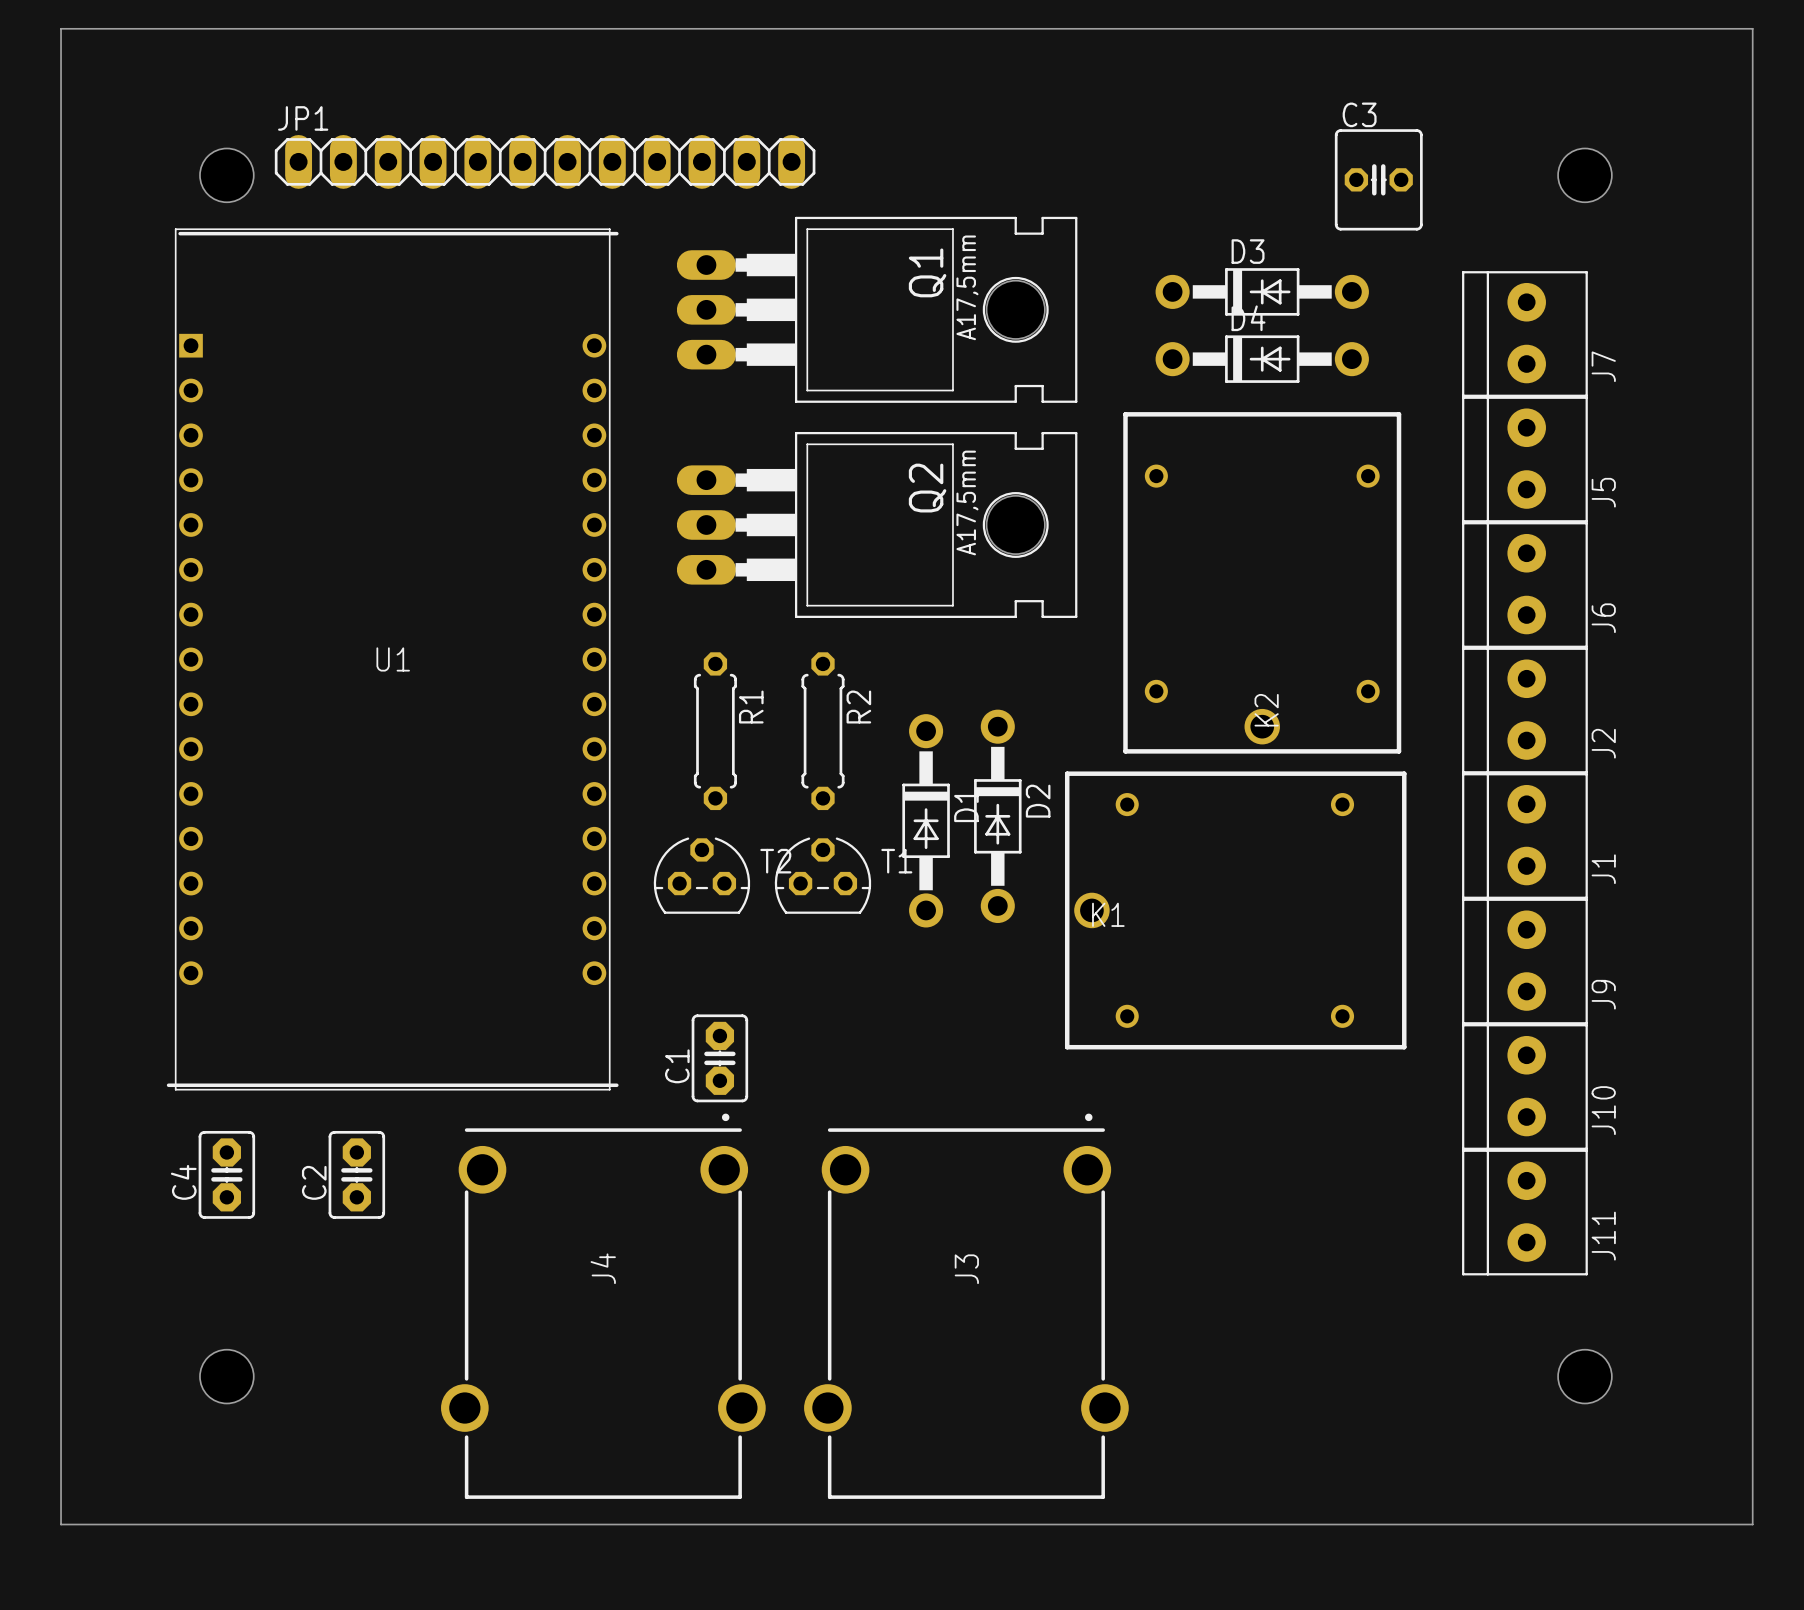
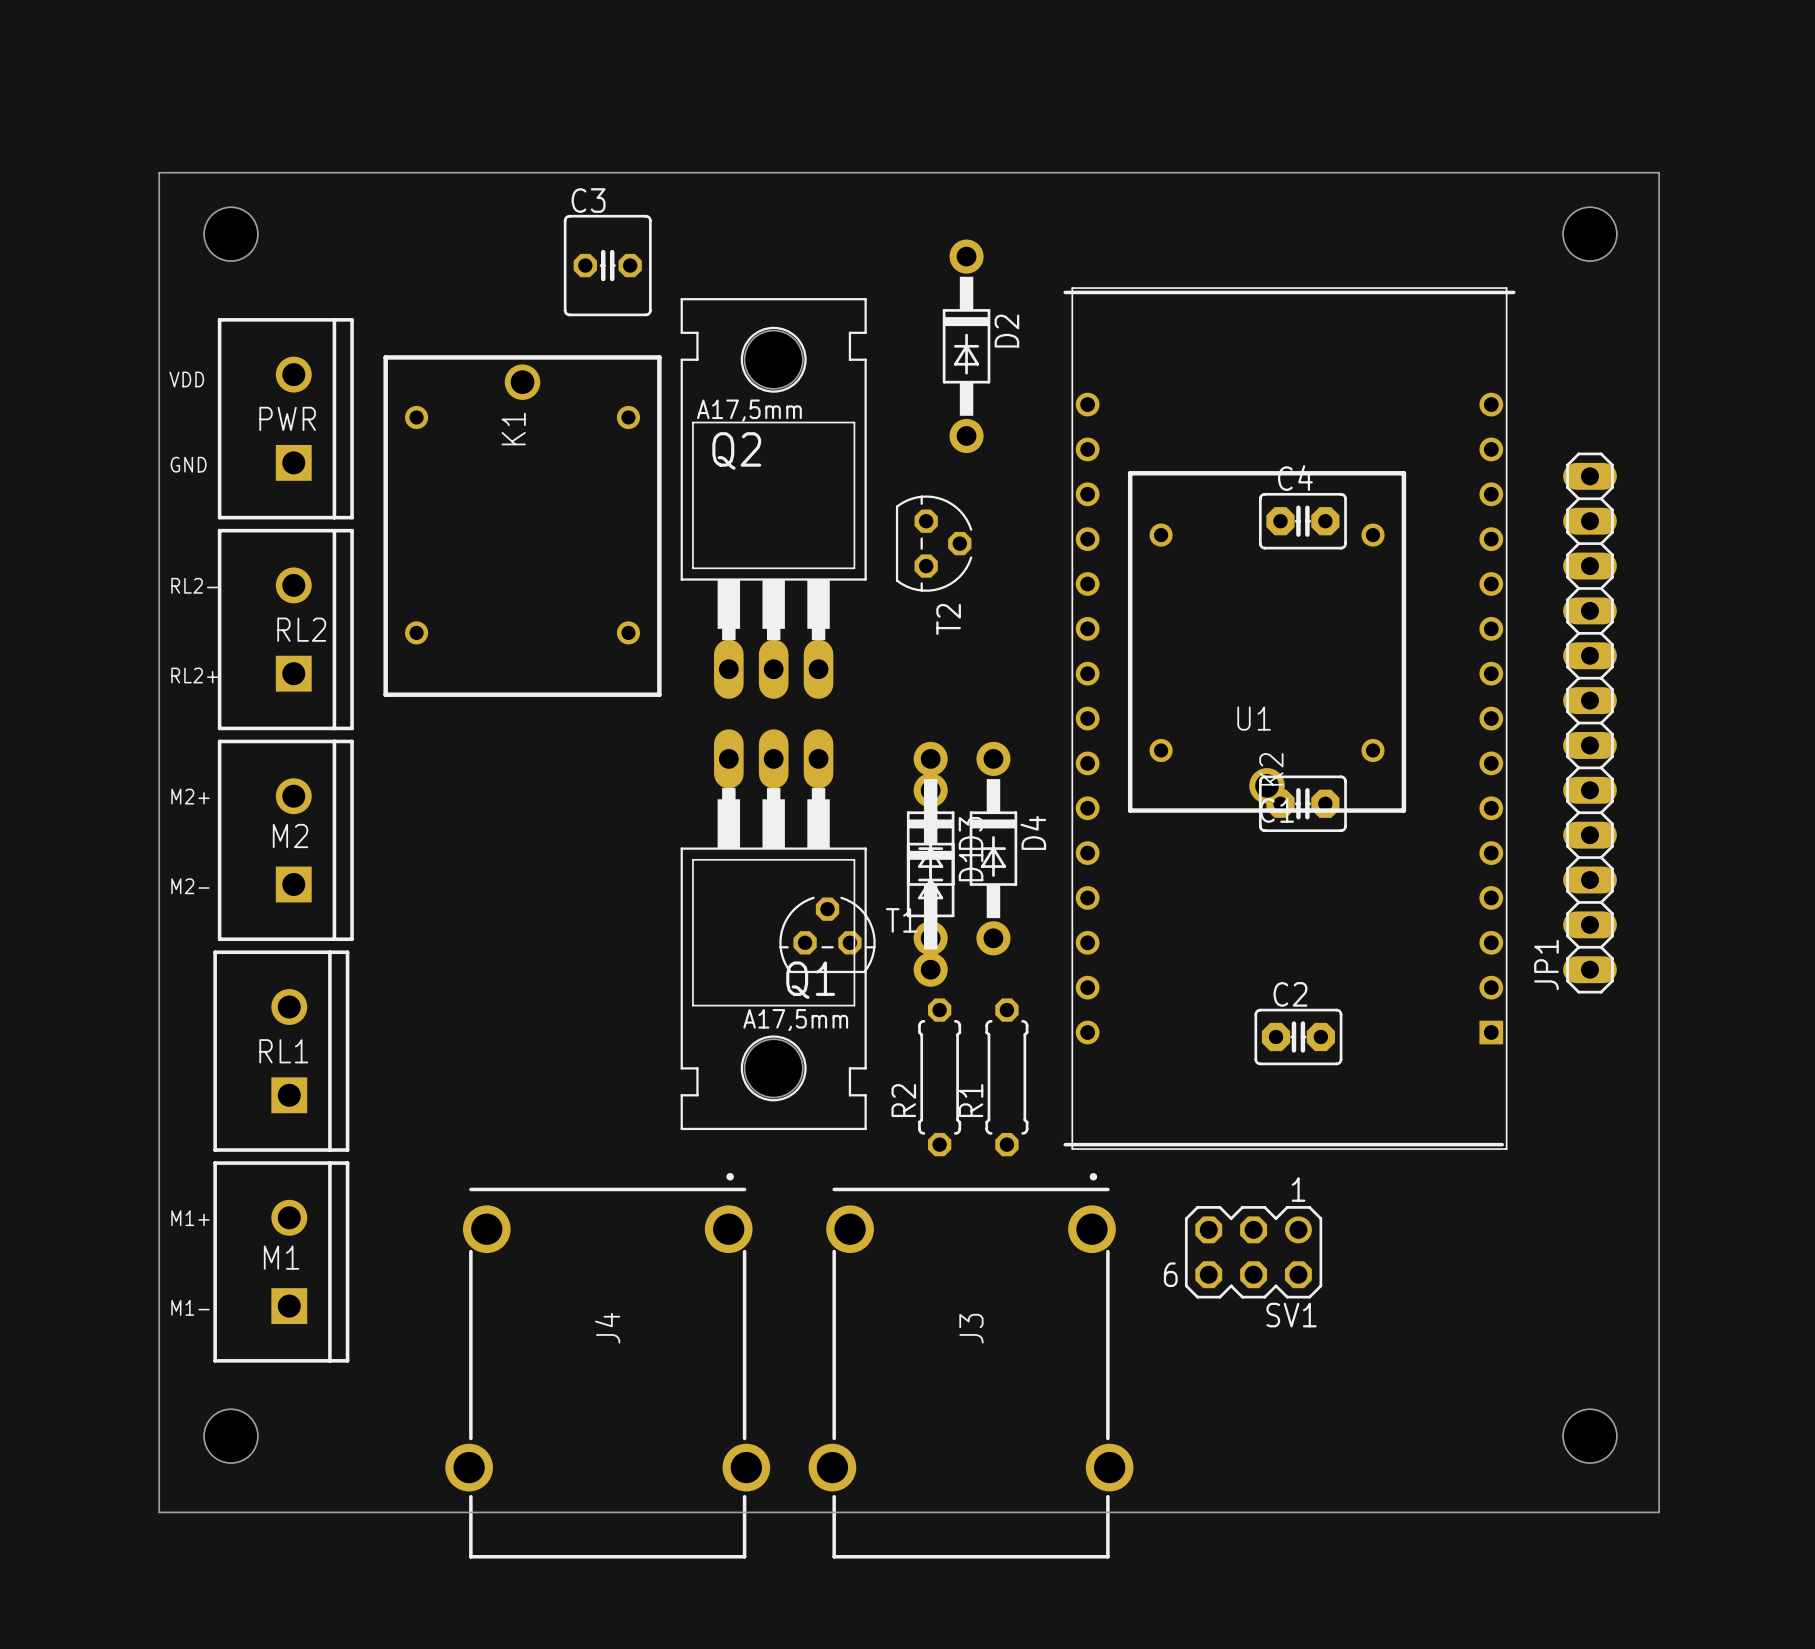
board edge: (61, 28) (1752, 28) (1752, 1524) (61, 1524) (61, 28) -> (159, 172) (159, 1512) (1659, 1512) (1659, 172) (159, 172)
JP1 name position: JP1 (303, 118) -> JP1 (1546, 965)
JP1 rotation: 0° (545, 161) -> 90° clockwise (1589, 723)
JP1 position: (545, 161) -> (1589, 723)
C3 position: (1378, 179) -> (607, 265)
D3 rotation: 0° (1262, 291) -> 90° clockwise (930, 848)
D3 position: (1262, 291) -> (930, 848)
Q1 rotation: 0° (877, 309) -> 90° clockwise (773, 929)
Q1 position: (877, 309) -> (773, 929)
text: none -> VDD (186, 379)
J7: (1524, 334) -> none
PWR: none -> (285, 418)
D4 rotation: 0° (1262, 359) -> 90° clockwise (993, 848)
D4 position: (1262, 359) -> (993, 848)
text: none -> GND (188, 464)
Q2 footprint: [676, 431, 1078, 618] -> [680, 298, 867, 699]
J5: (1524, 459) -> none
Q2 name position: Q2 (927, 488) -> Q2 (736, 450)
text: none -> RL2- (194, 585)
RL2: none -> (285, 629)
J6: (1524, 585) -> none
text: none -> RL2+ (194, 675)
U1 rotation: 0° (392, 659) -> 180° (1289, 718)
U1 position: (392, 659) -> (1289, 718)
U1 name position: U1 (393, 659) -> U1 (1254, 718)
R1 name position: R1 (751, 707) -> R1 (971, 1100)
R2 name position: R2 (858, 707) -> R2 (903, 1100)
J2: (1524, 710) -> none
R1 position: (715, 731) -> (1006, 1077)
R2 position: (822, 731) -> (939, 1077)
text: none -> M2+ (190, 796)
M2: none -> (285, 840)
D2 position: (997, 816) -> (966, 346)
text: none -> M2- (190, 886)
J1: (1524, 836) -> none
T2 rotation: 0° (701, 875) -> 90° clockwise (934, 543)
T2 position: (701, 875) -> (934, 543)
K1 rotation: 0° (1235, 910) -> 90° clockwise (522, 526)
K1 position: (1235, 910) -> (522, 526)
J9: (1524, 961) -> none
RL1: none -> (281, 1051)
C1 rotation: 0° (719, 1058) -> 90° clockwise (1302, 803)
C1 position: (719, 1058) -> (1302, 803)
J10: (1524, 1087) -> none
text: none -> M1+ (190, 1218)
C4 rotation: 0° (226, 1174) -> 90° clockwise (1302, 521)
C4 position: (226, 1174) -> (1302, 521)
C2 rotation: 0° (356, 1174) -> 90° clockwise (1298, 1036)
C2 position: (356, 1174) -> (1298, 1036)
SV1: none -> (1253, 1252)
M1: none -> (281, 1261)
J11: (1524, 1212) -> none
text: none -> M1- (190, 1307)

